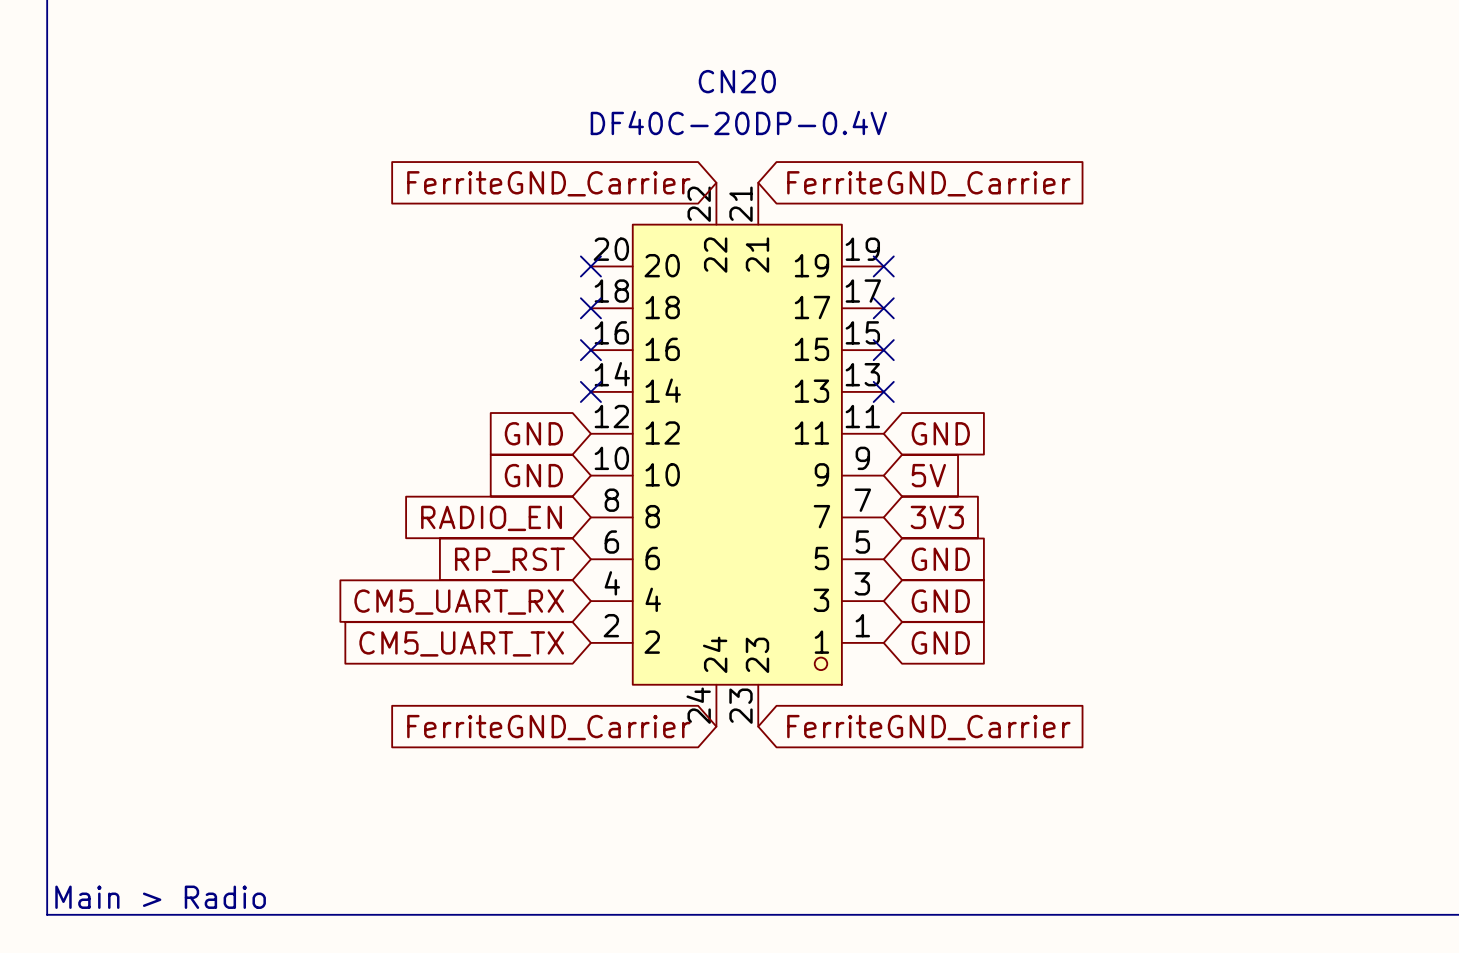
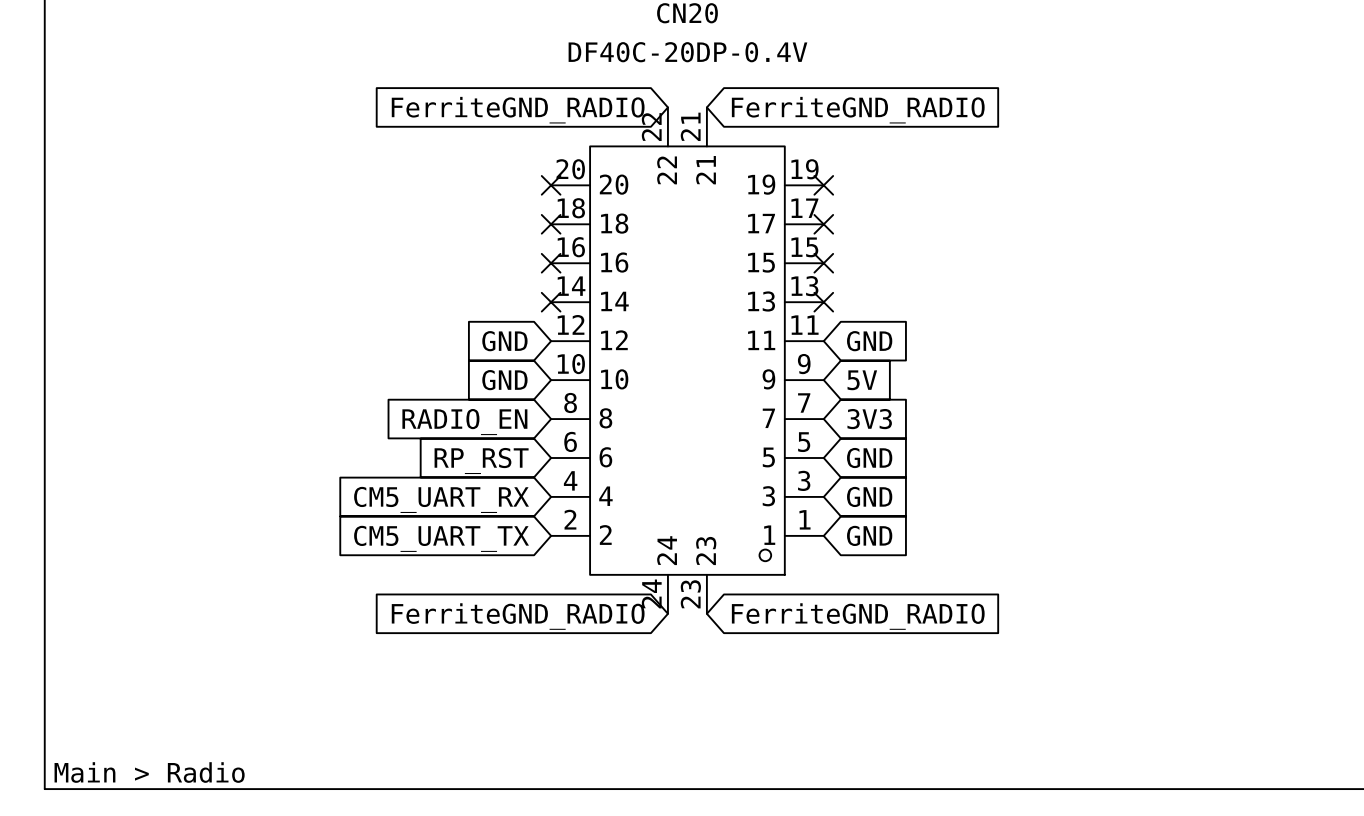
global label: FerriteGND_Carrier (548, 183) -> FerriteGND_RADIO (518, 110)
global label: FerriteGND_Carrier (928, 183) -> FerriteGND_RADIO (858, 110)
global label: FerriteGND_Carrier (548, 727) -> FerriteGND_RADIO (518, 616)
global label: FerriteGND_Carrier (928, 727) -> FerriteGND_RADIO (858, 616)

